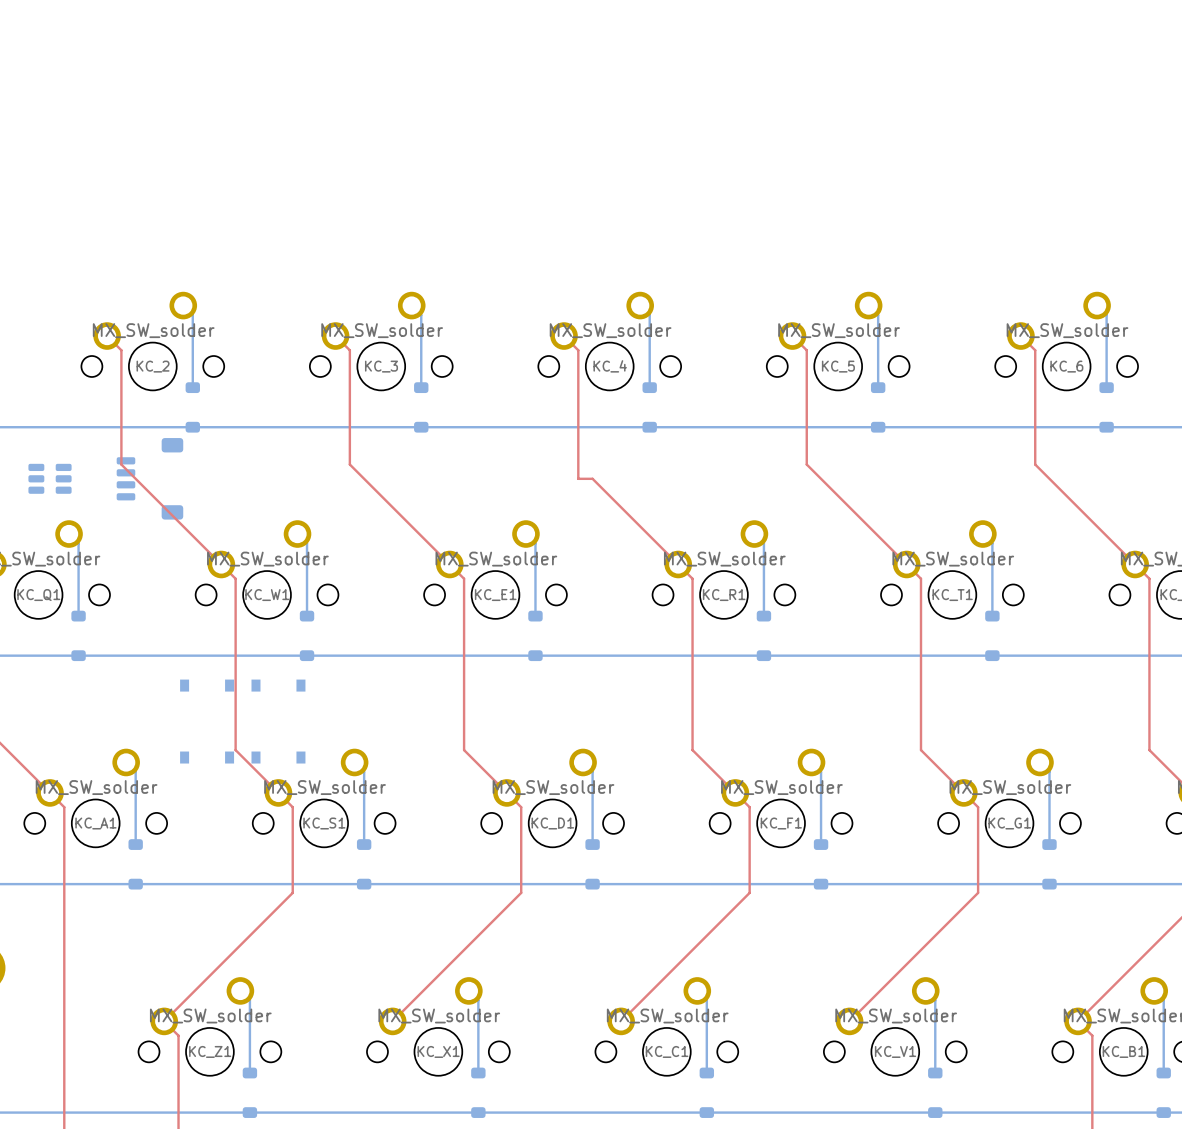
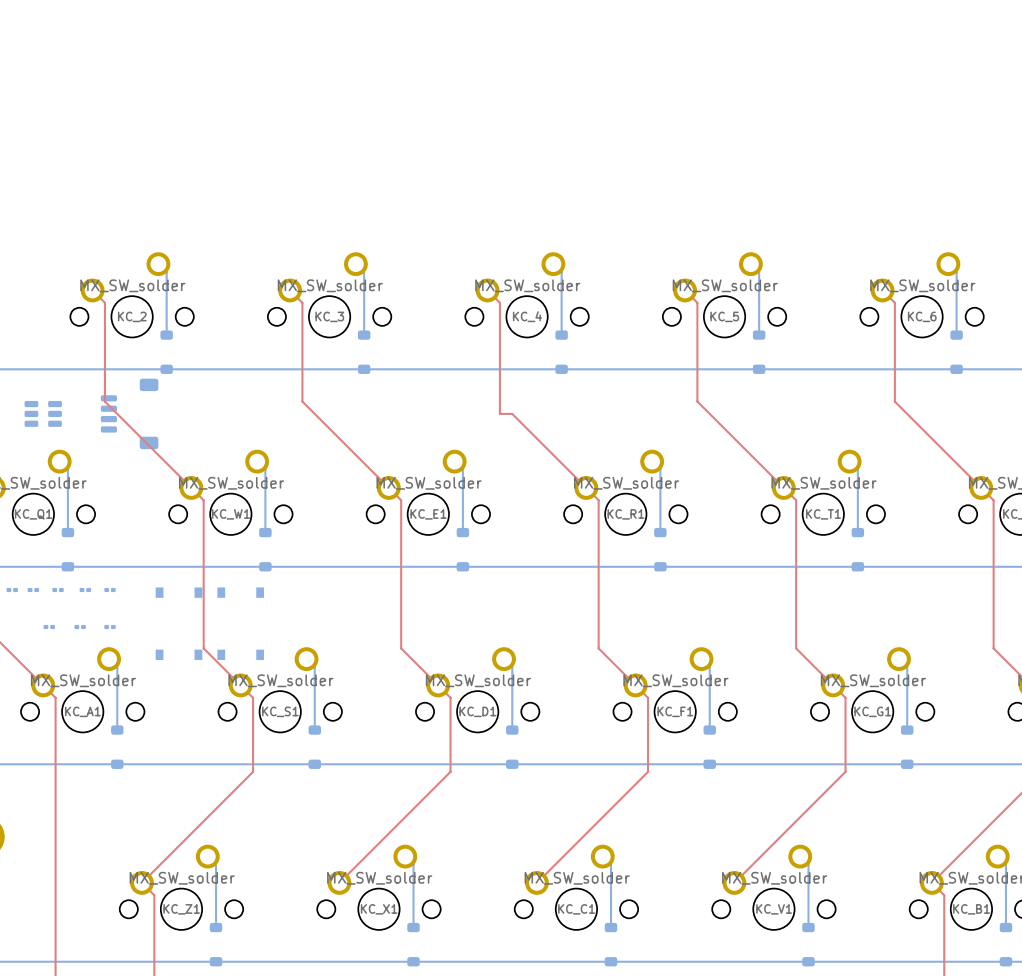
part: none -> (12, 589)
part: none -> (33, 589)
part: none -> (58, 589)
part: none -> (85, 589)
part: none -> (110, 589)
part: none -> (49, 627)
part: none -> (80, 627)
part: none -> (110, 627)

